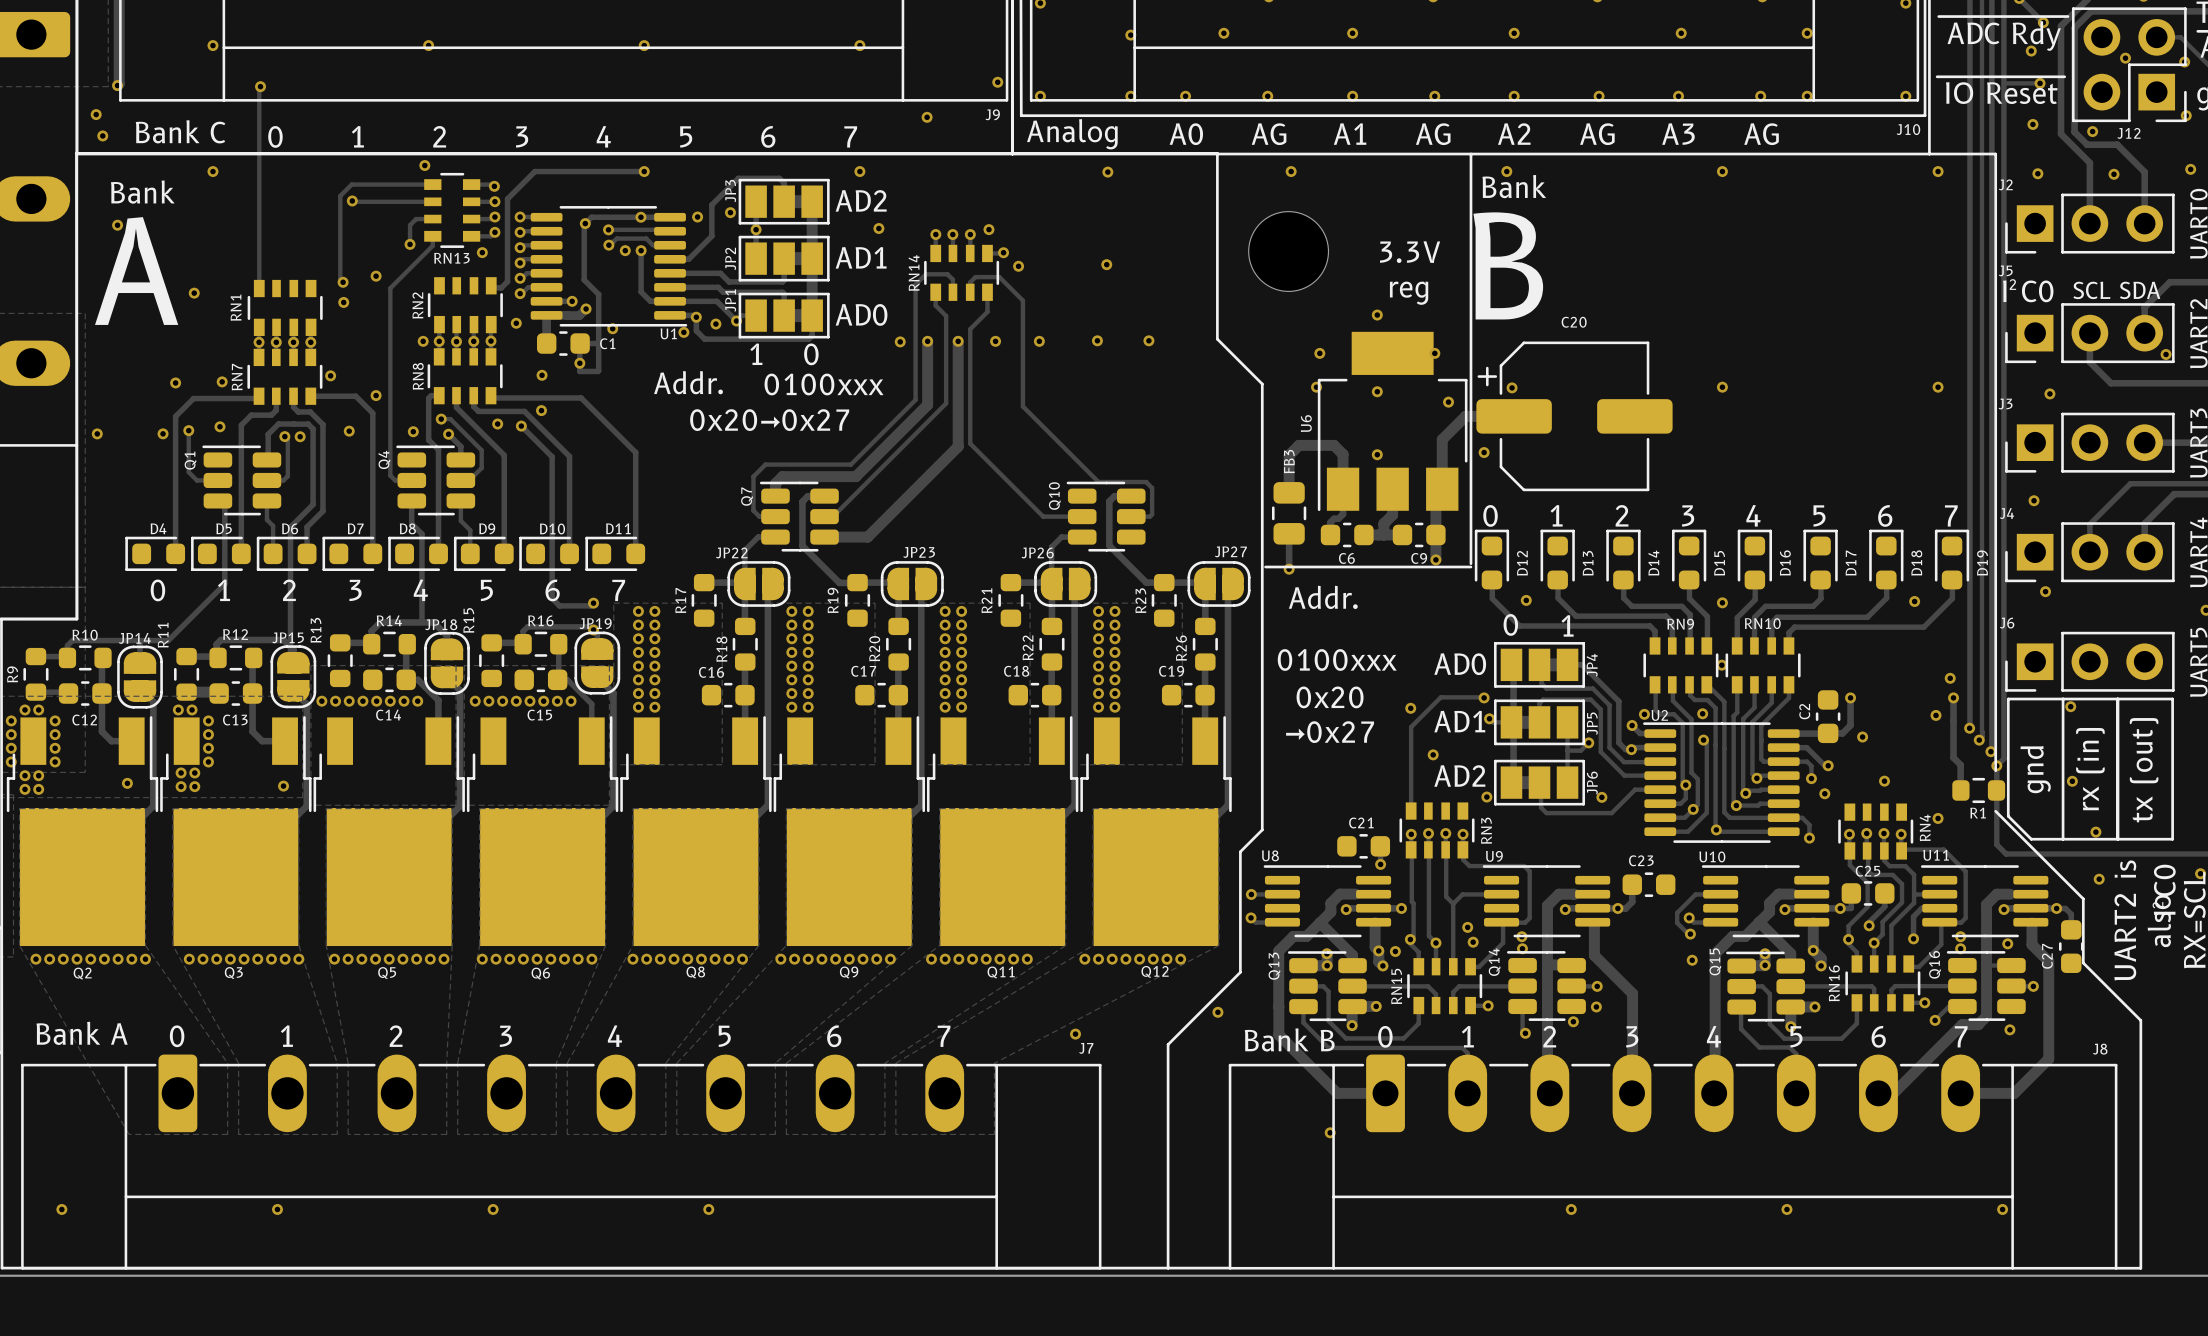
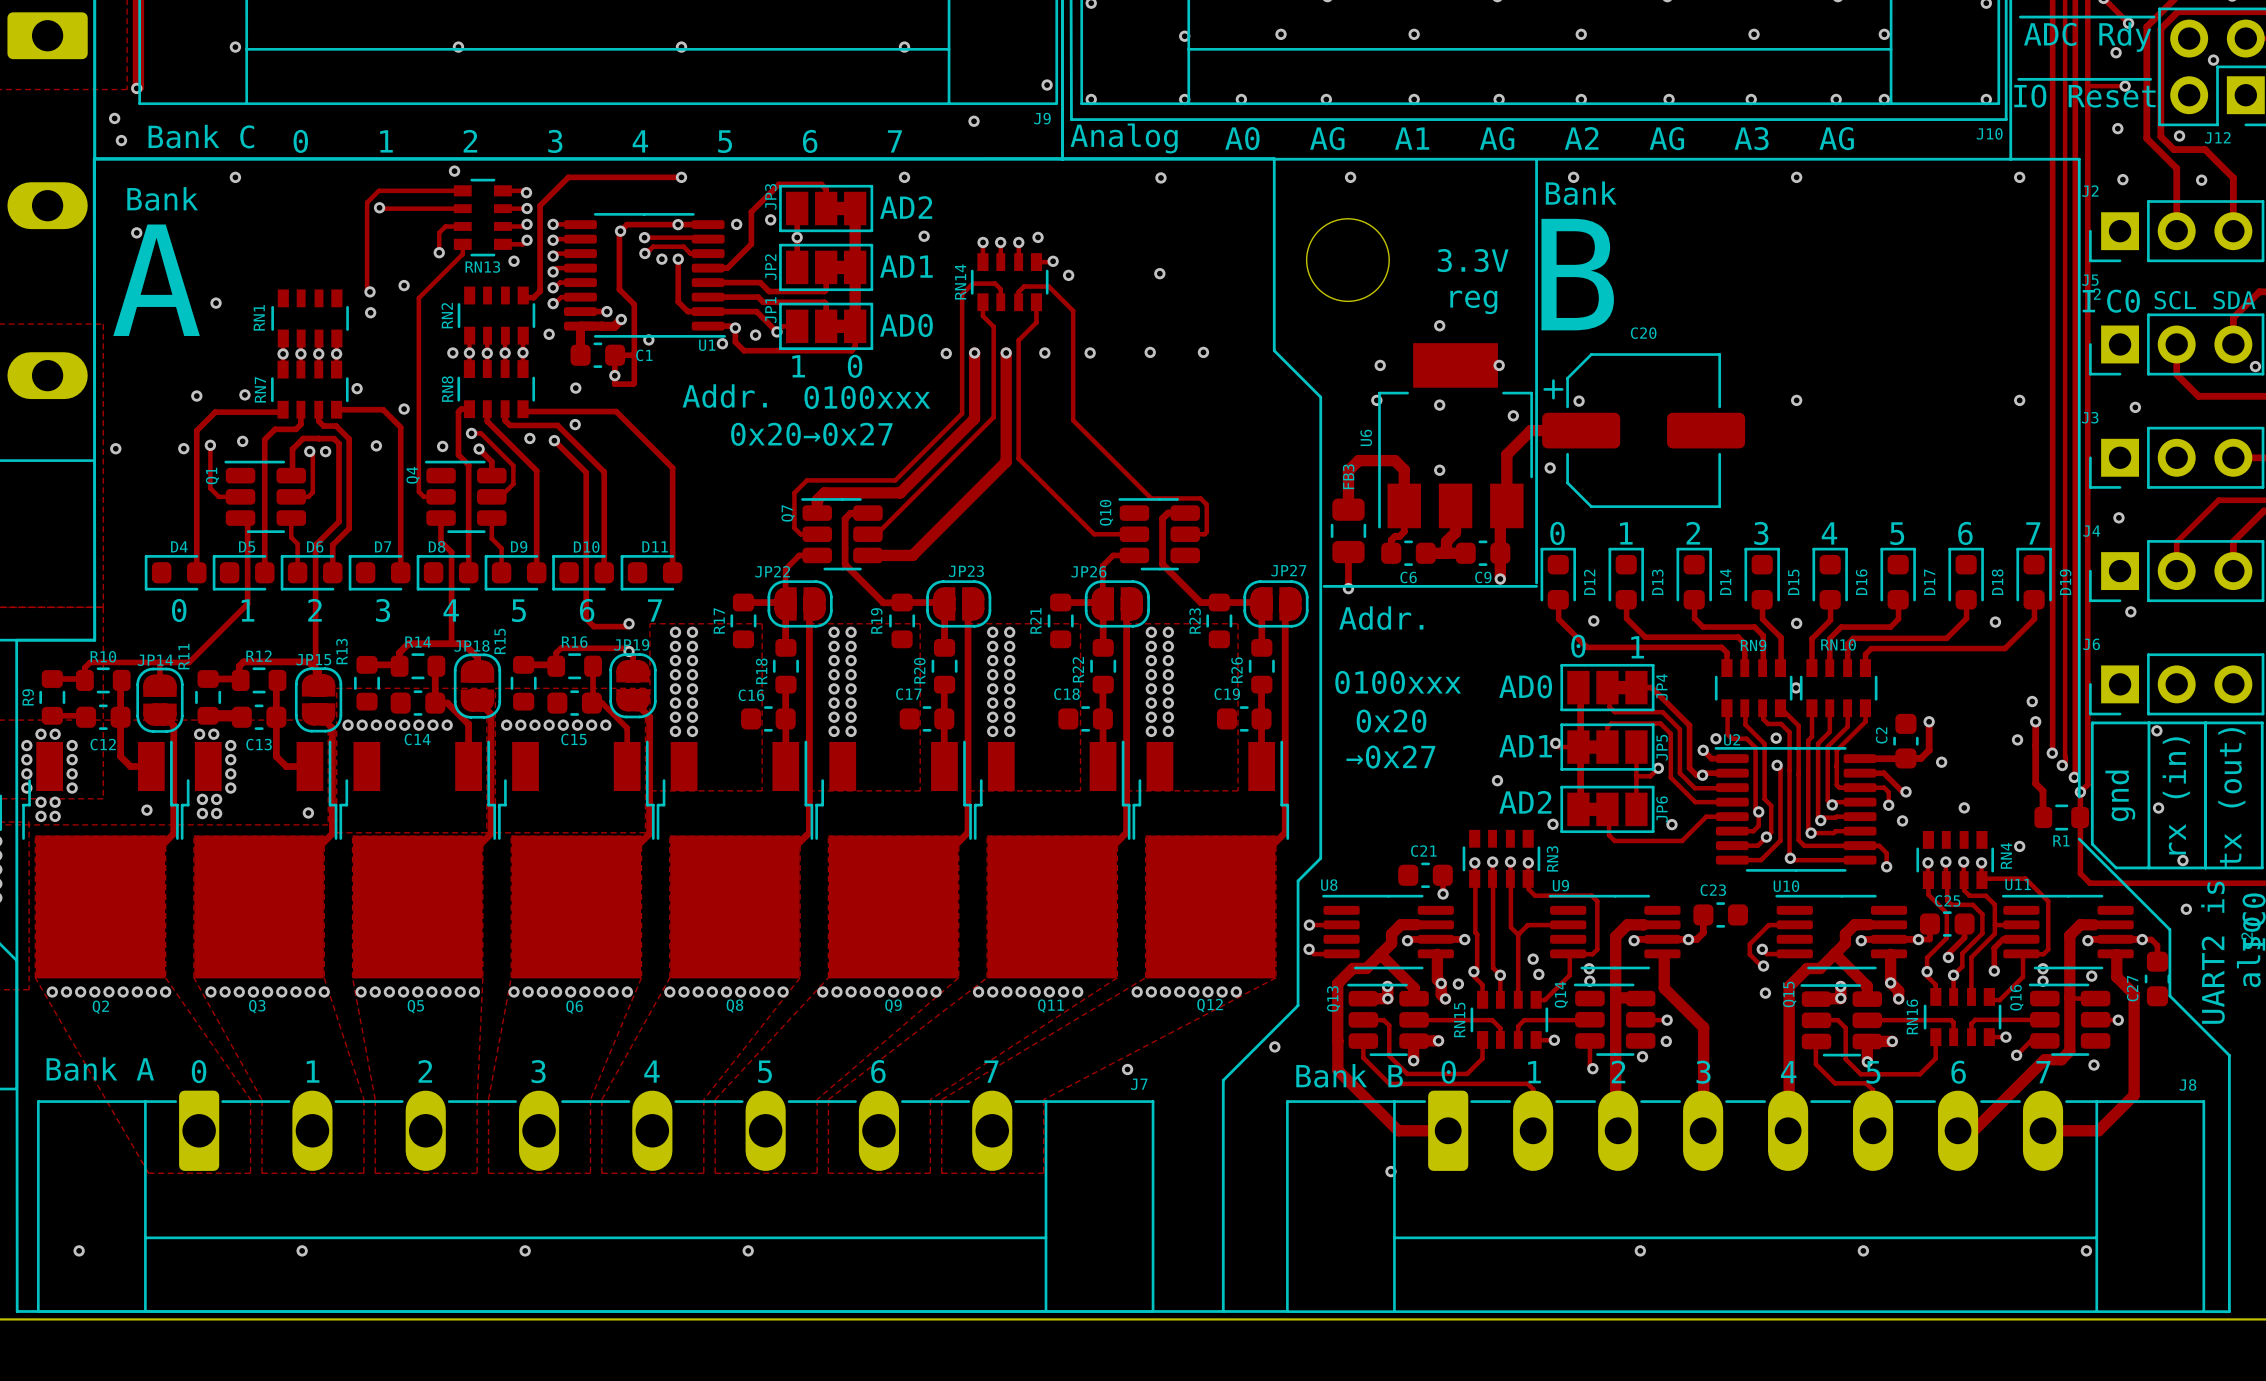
track: (260, 86) (259, 288) -> none
via: (260, 86) -> none
track: (1481, 697) (1440, 697) (1411, 727) (1411, 811) -> none
via: (1484, 697) -> none
via: (1410, 708) -> none

